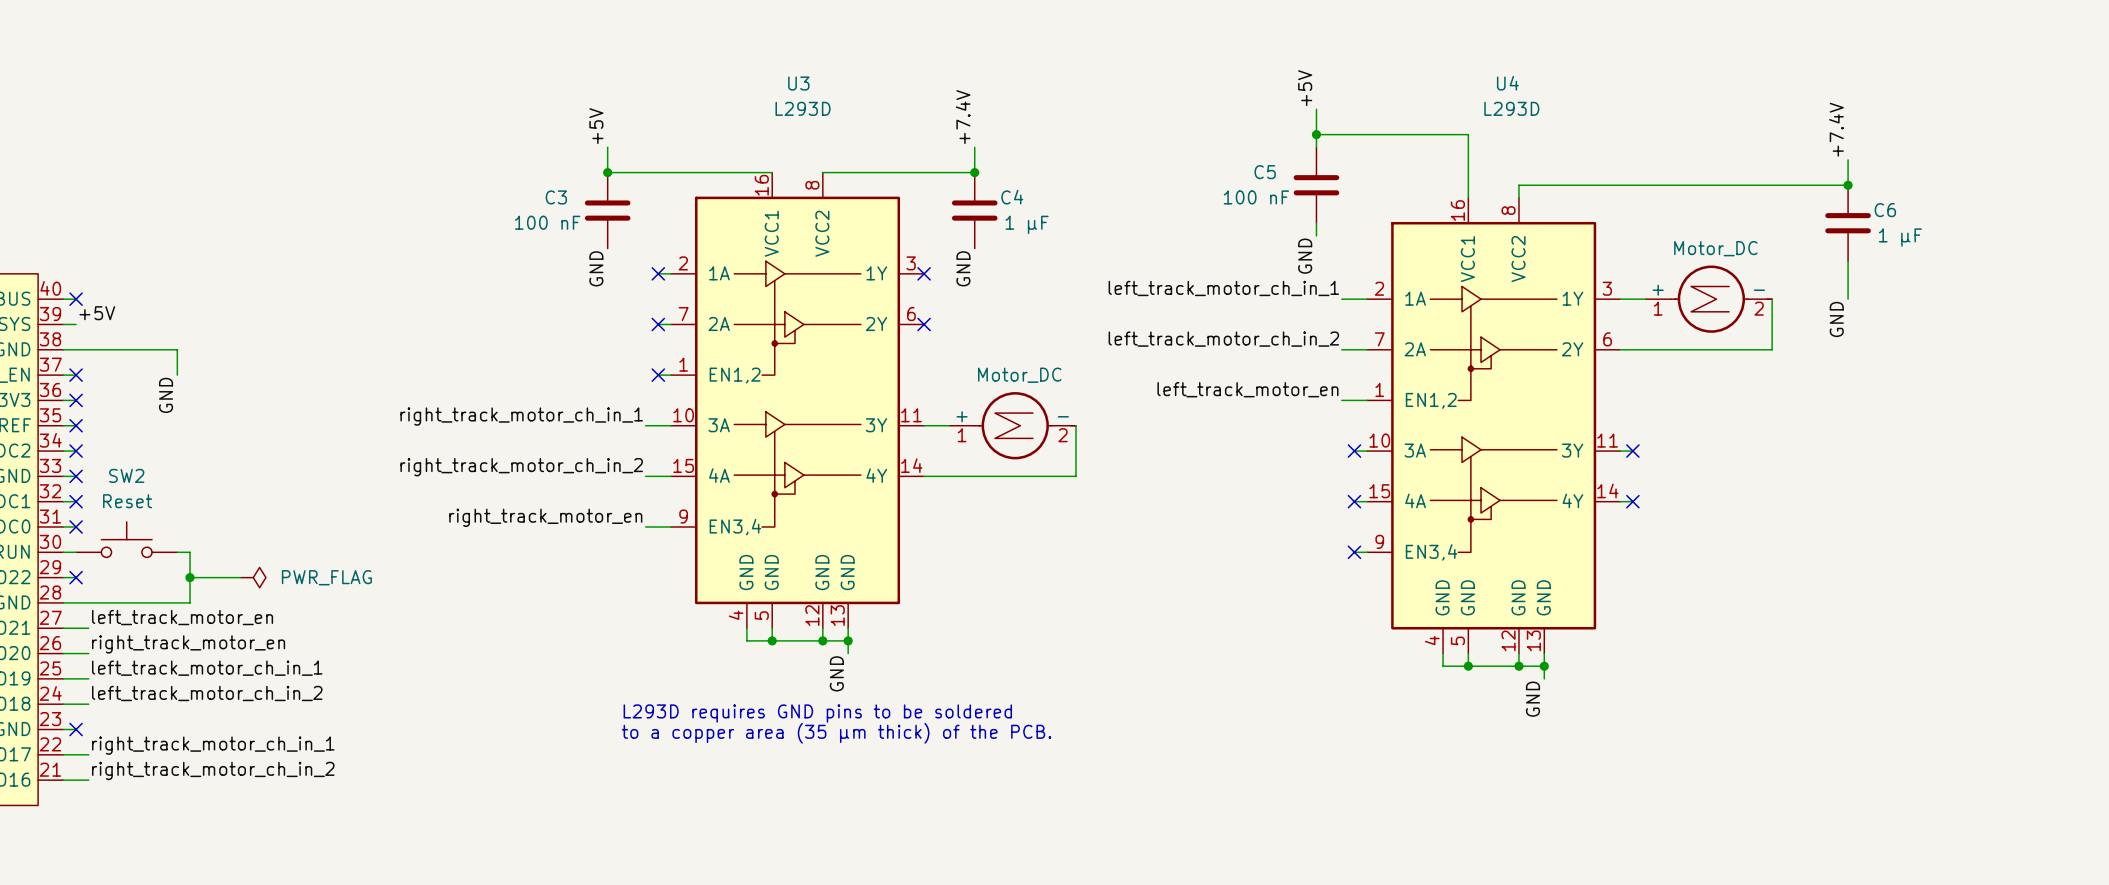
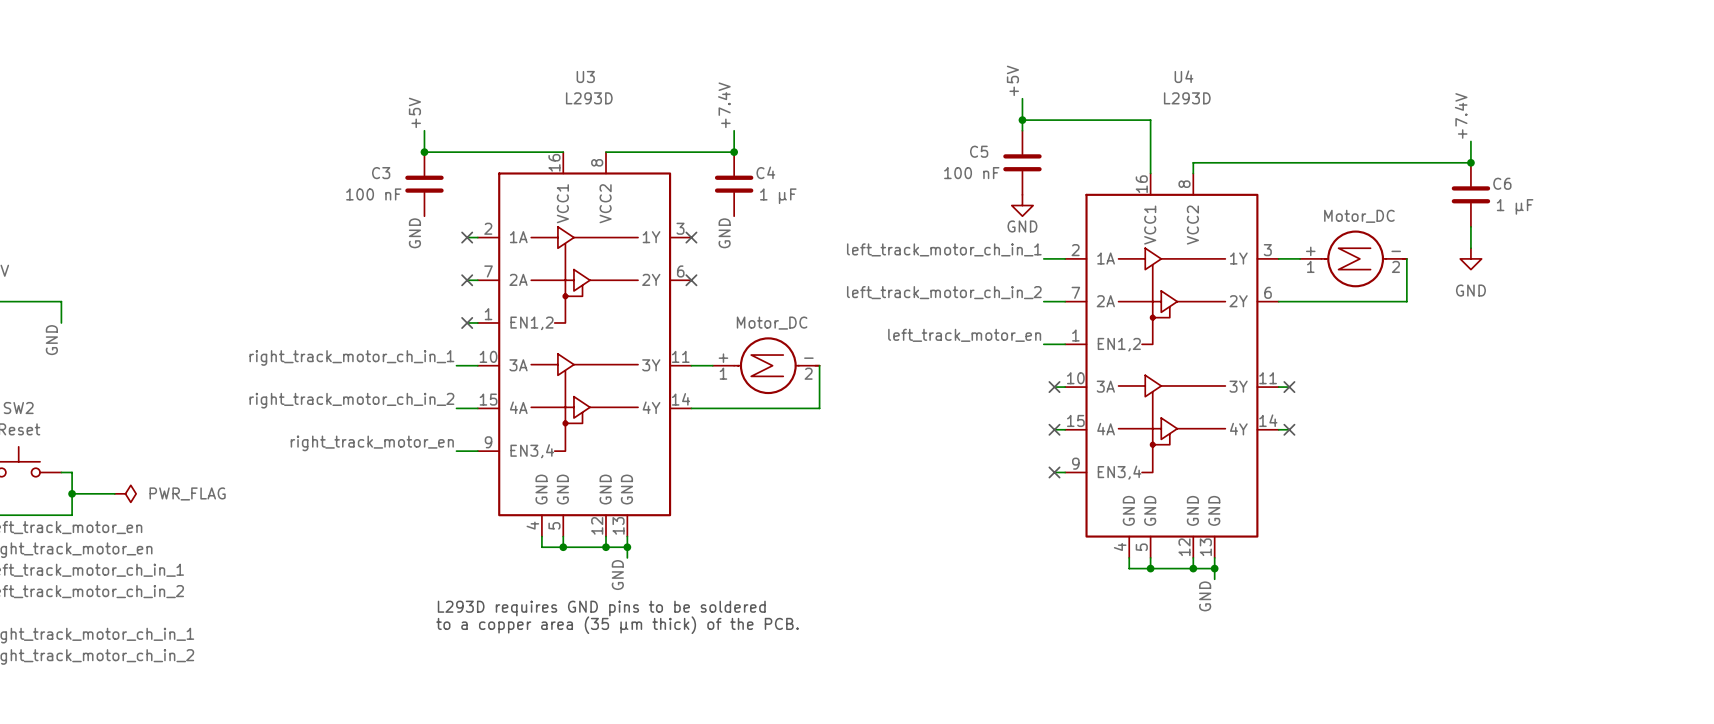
power symbol: none -> GND (1022, 205)
label: GND (1305, 256) -> none
power symbol: none -> GND (1470, 258)
label: GND (1836, 319) -> none

